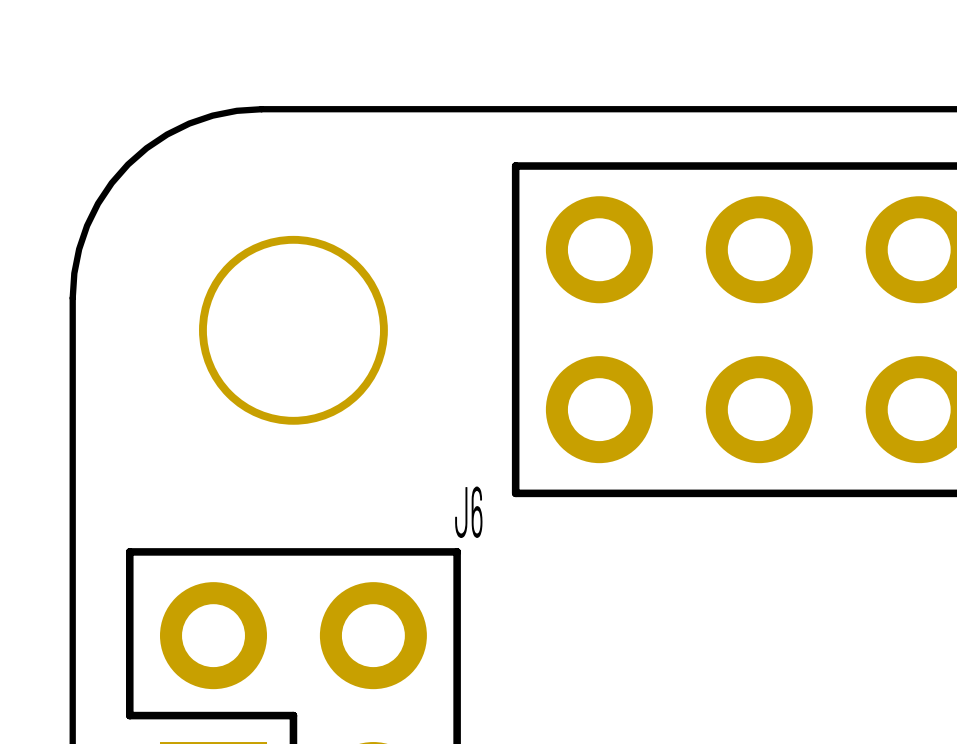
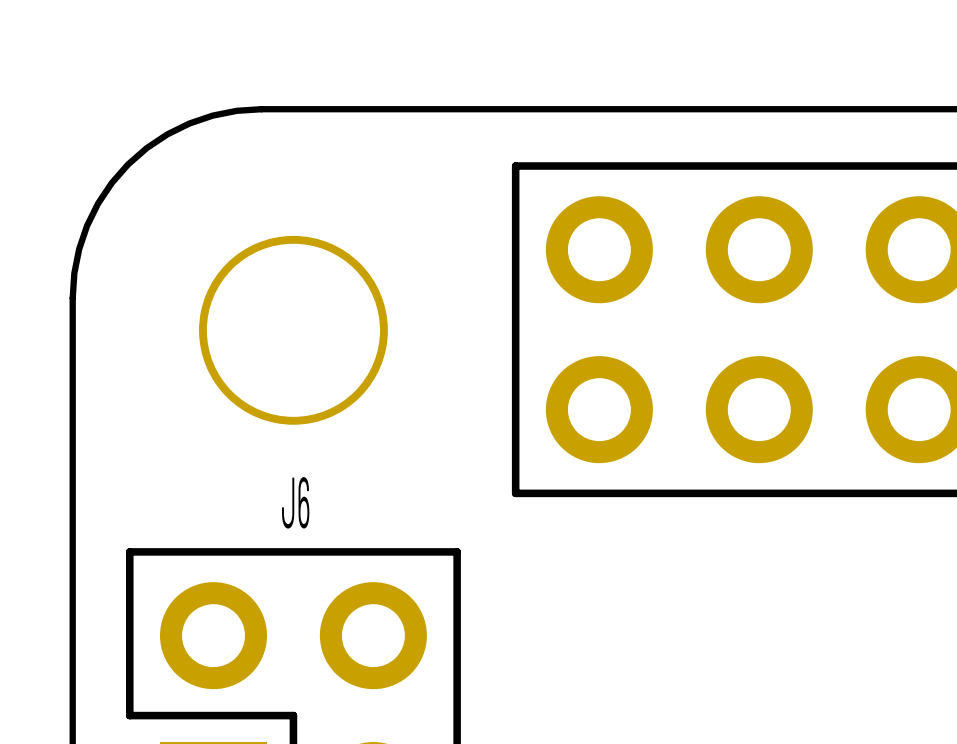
J6 name position: J6 (468, 512) -> J6 (295, 502)

